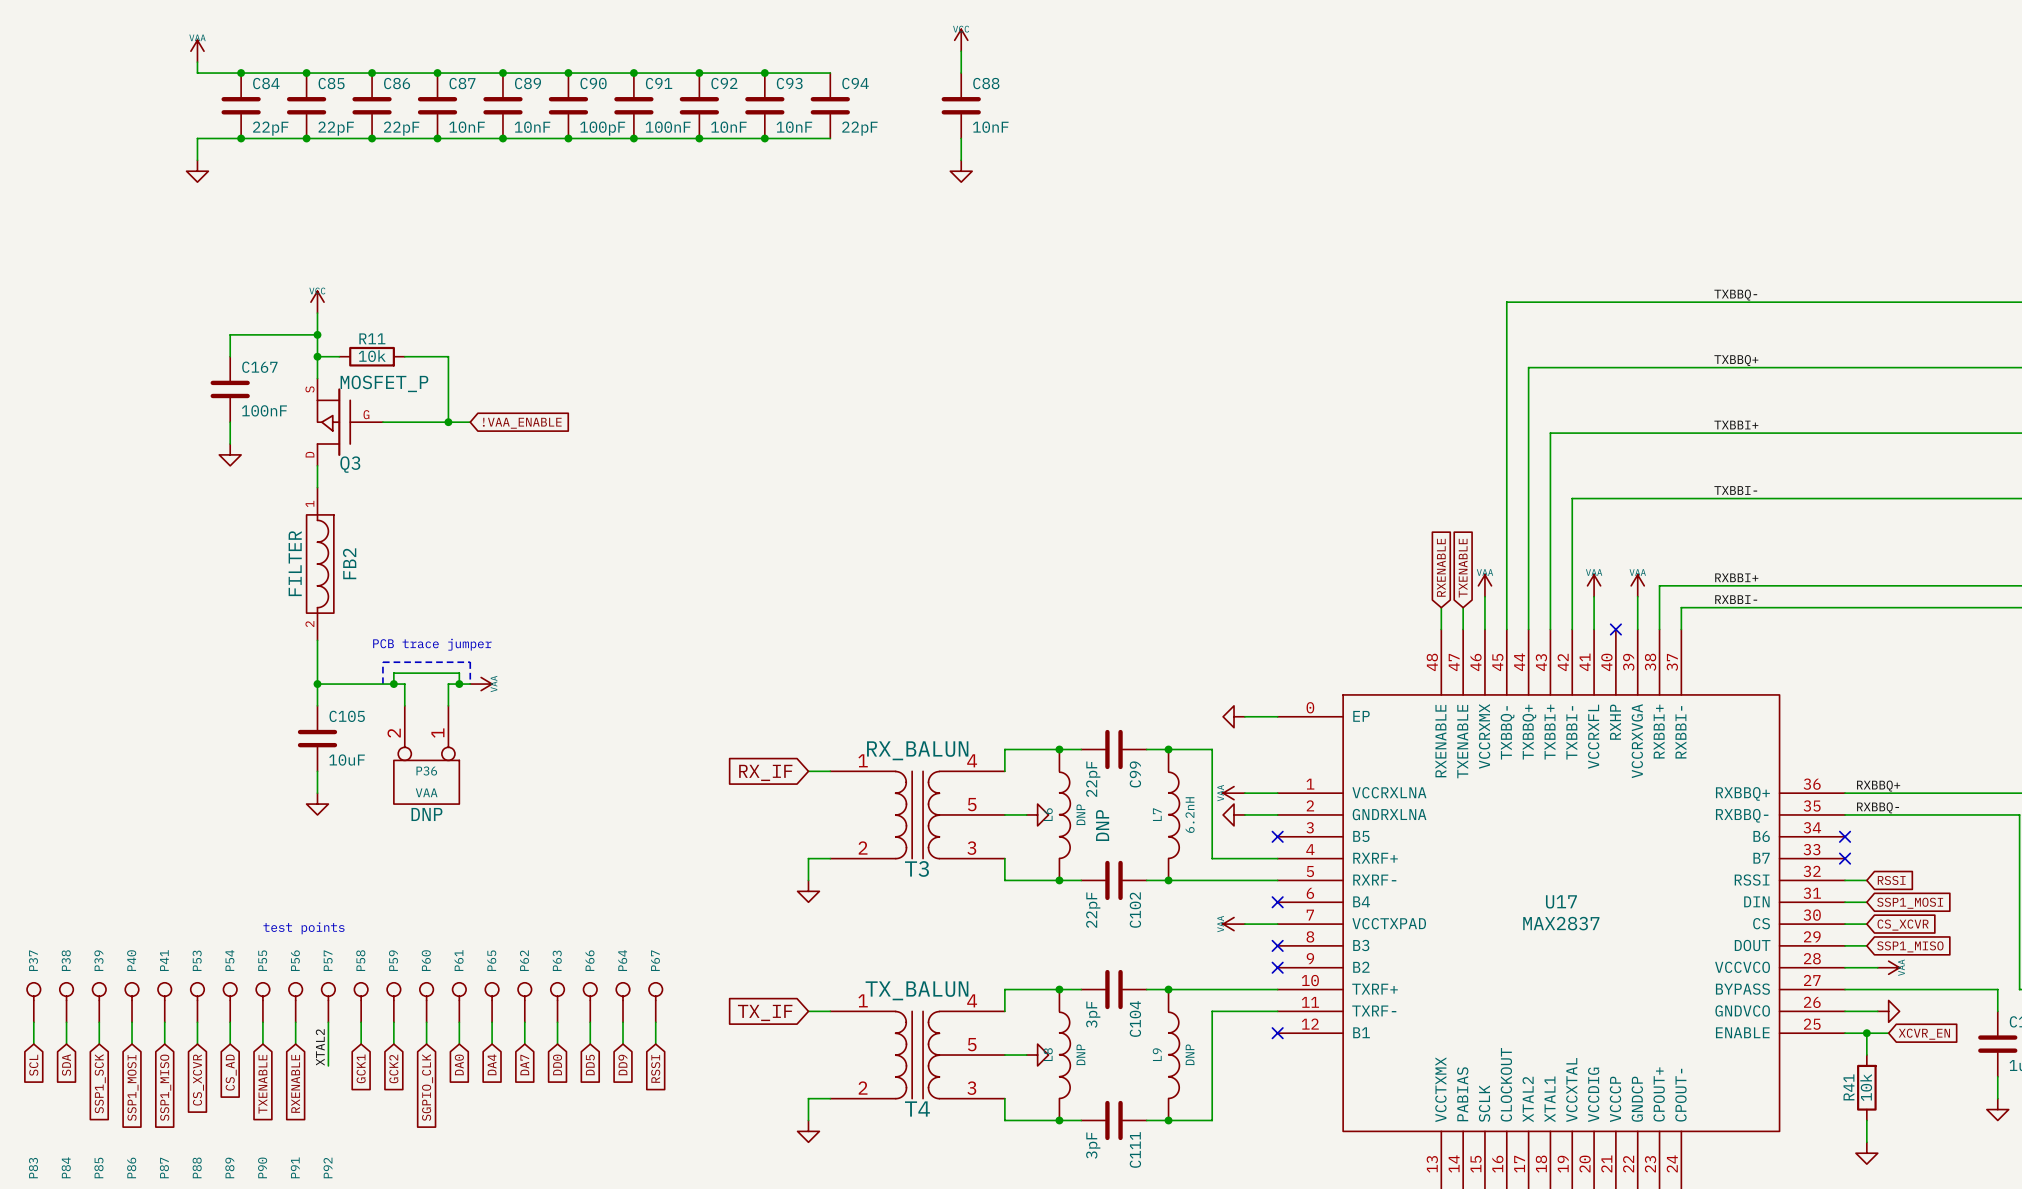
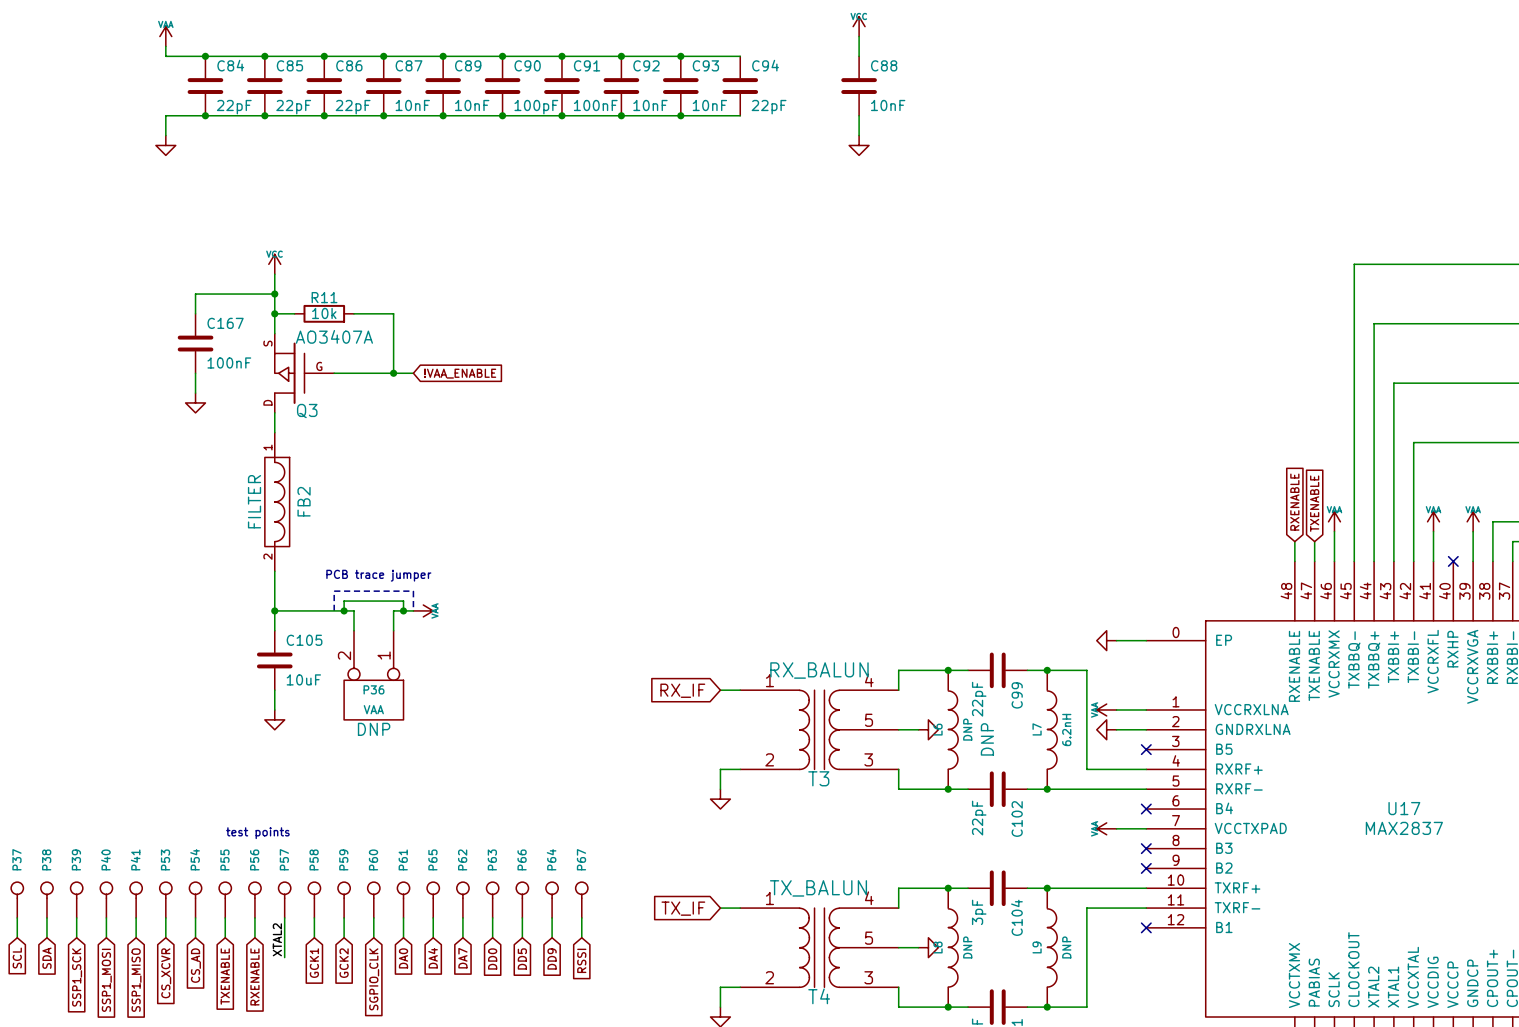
Q3 value: MOSFET_P (384, 383) -> AO3407A (334, 336)

